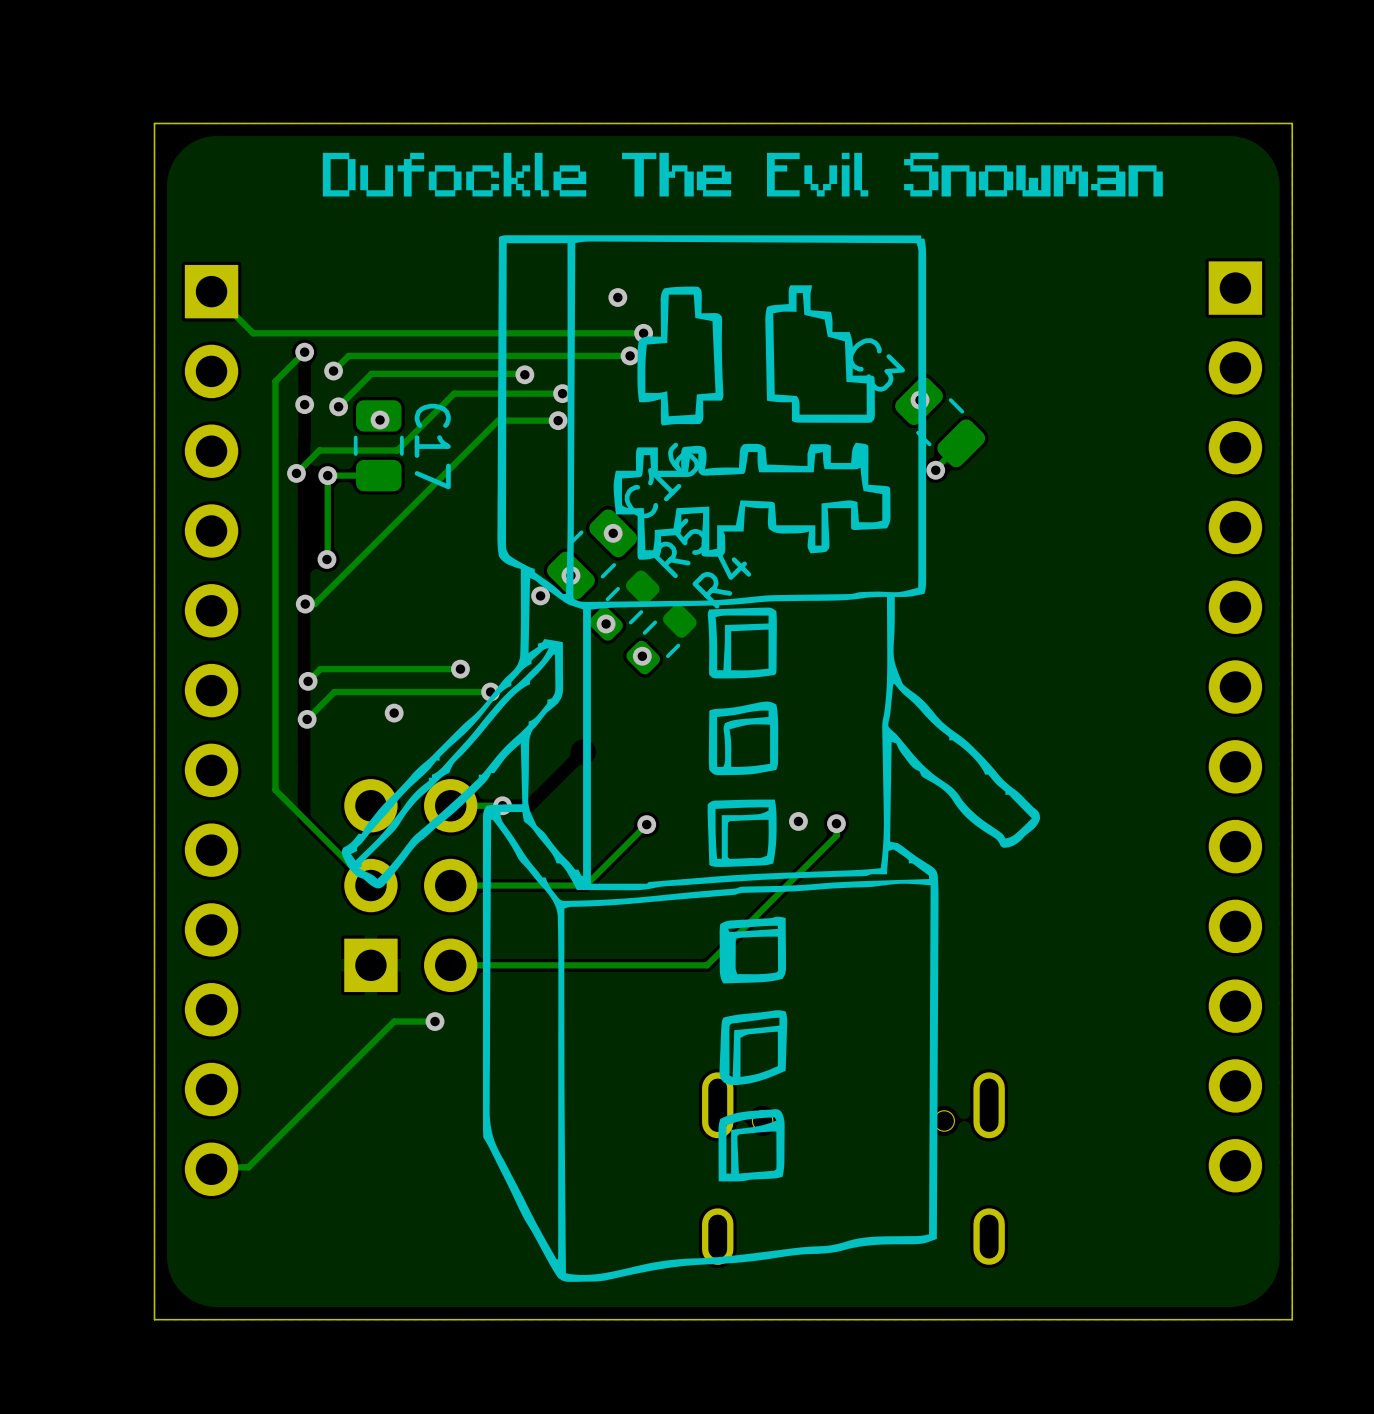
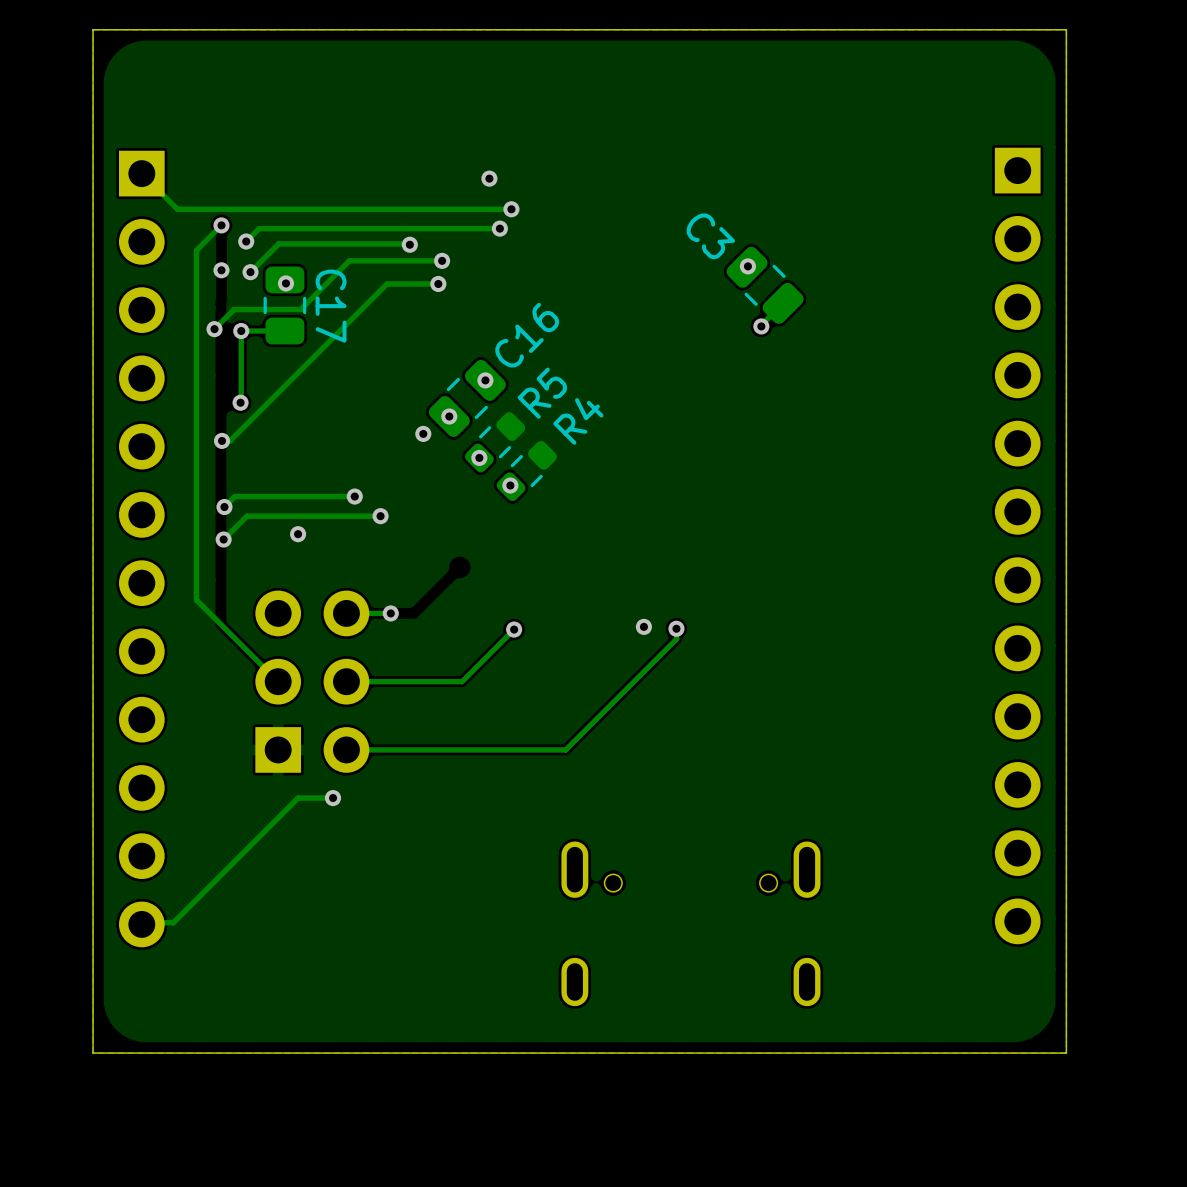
drawing: [322, 152, 1163, 197] -> none
drawing: [341, 235, 1041, 1282] -> none

